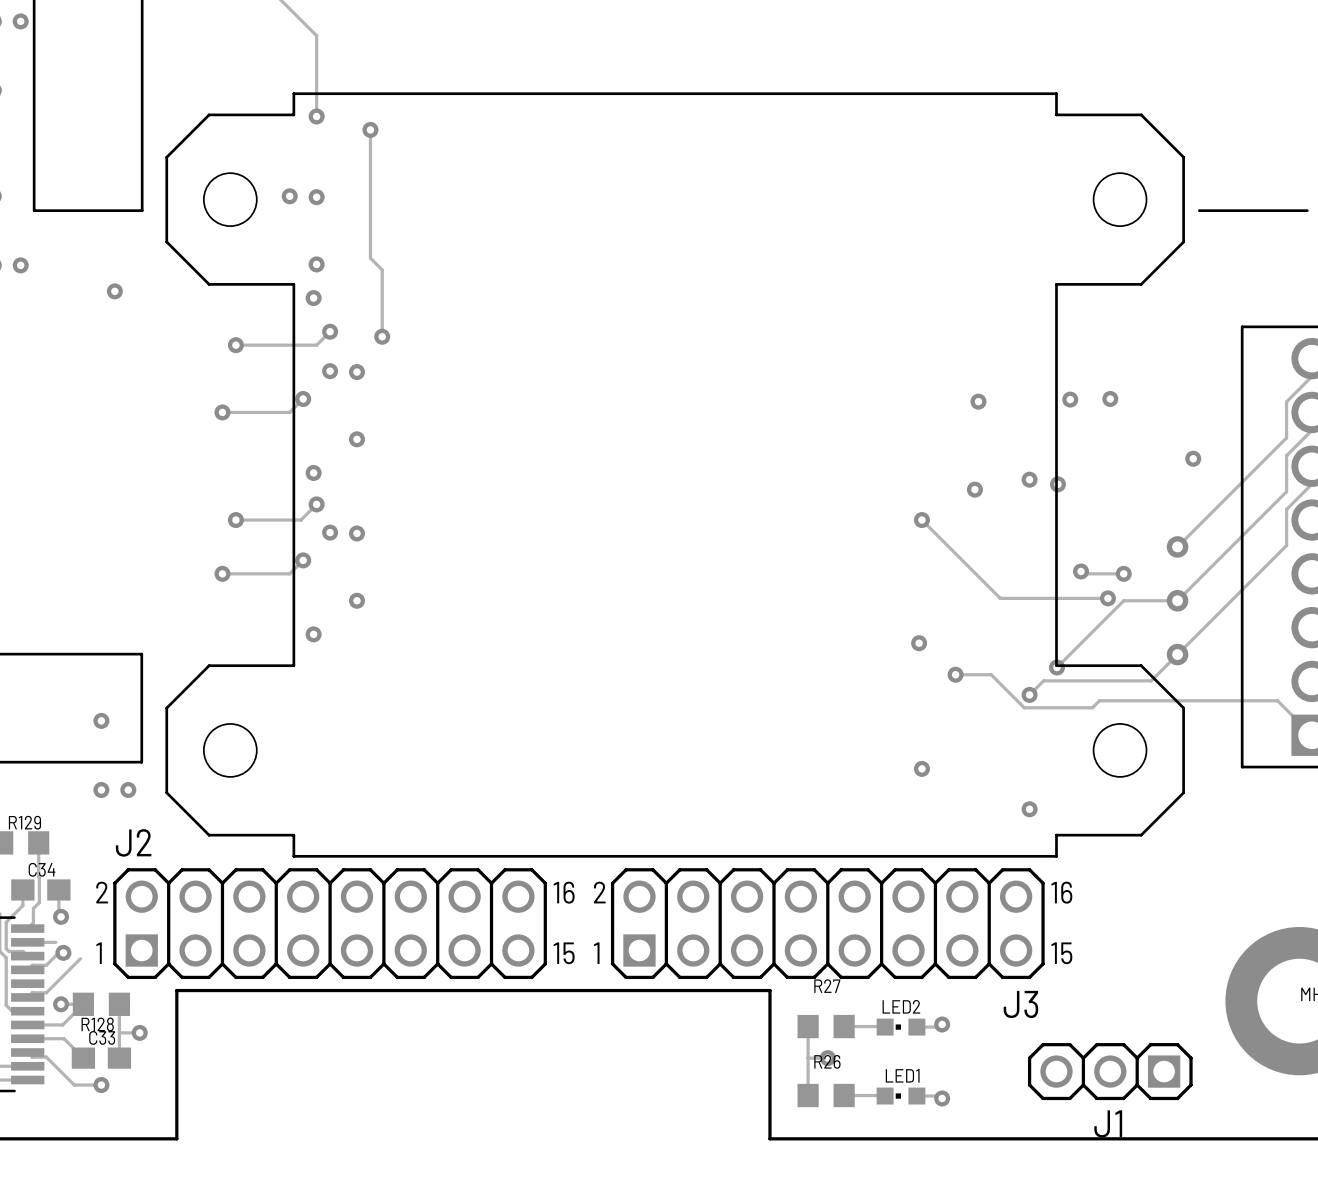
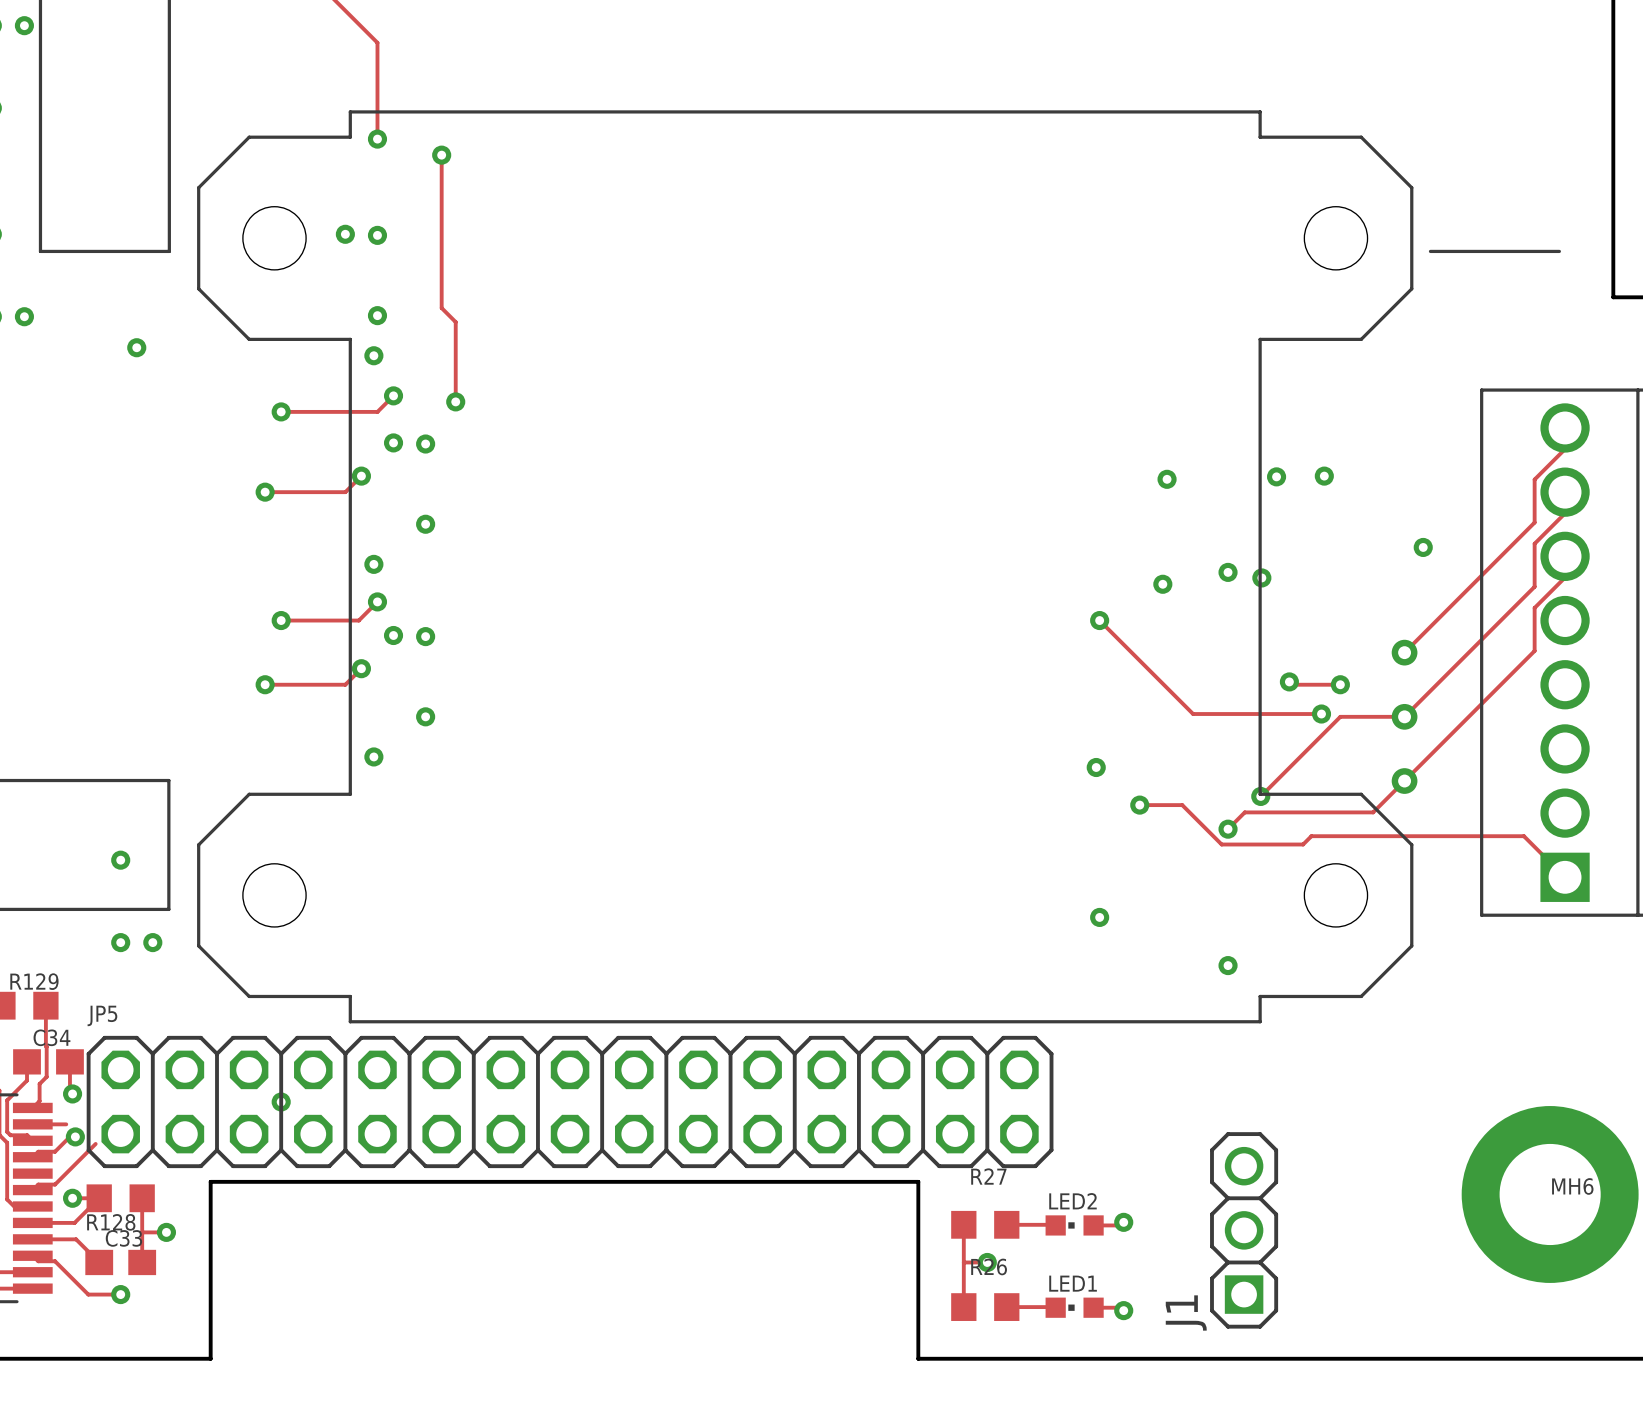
via: none -> (281, 1101)
J2: (330, 923) -> none
JP5: none -> (570, 1101)
J3: (827, 923) -> none
J1 rotation: 0° (1110, 1071) -> 90° clockwise (1244, 1230)

